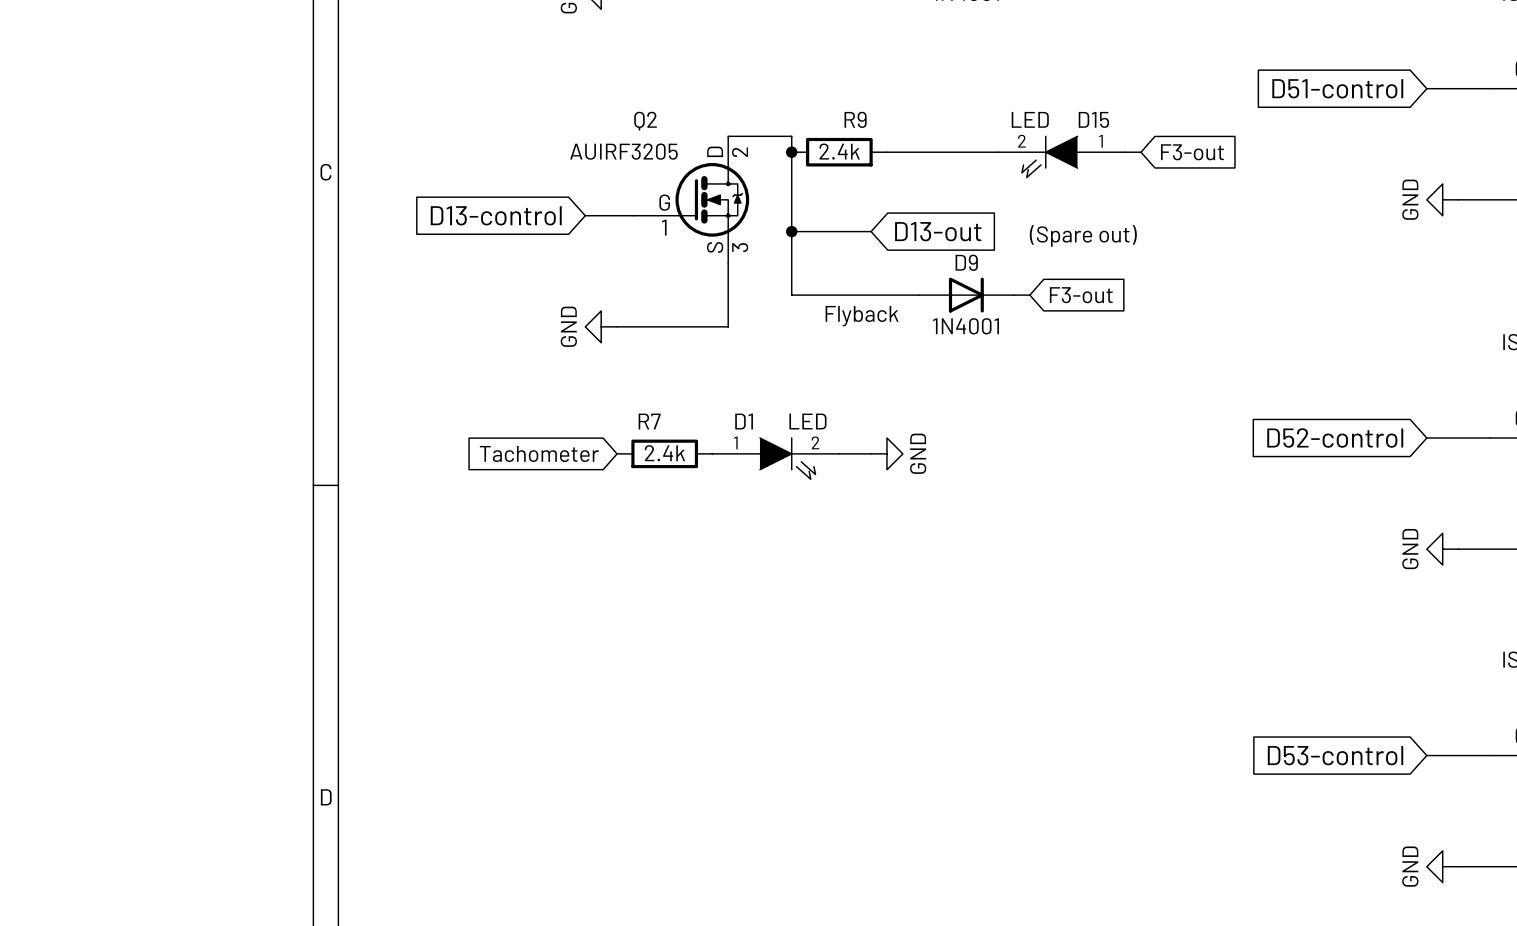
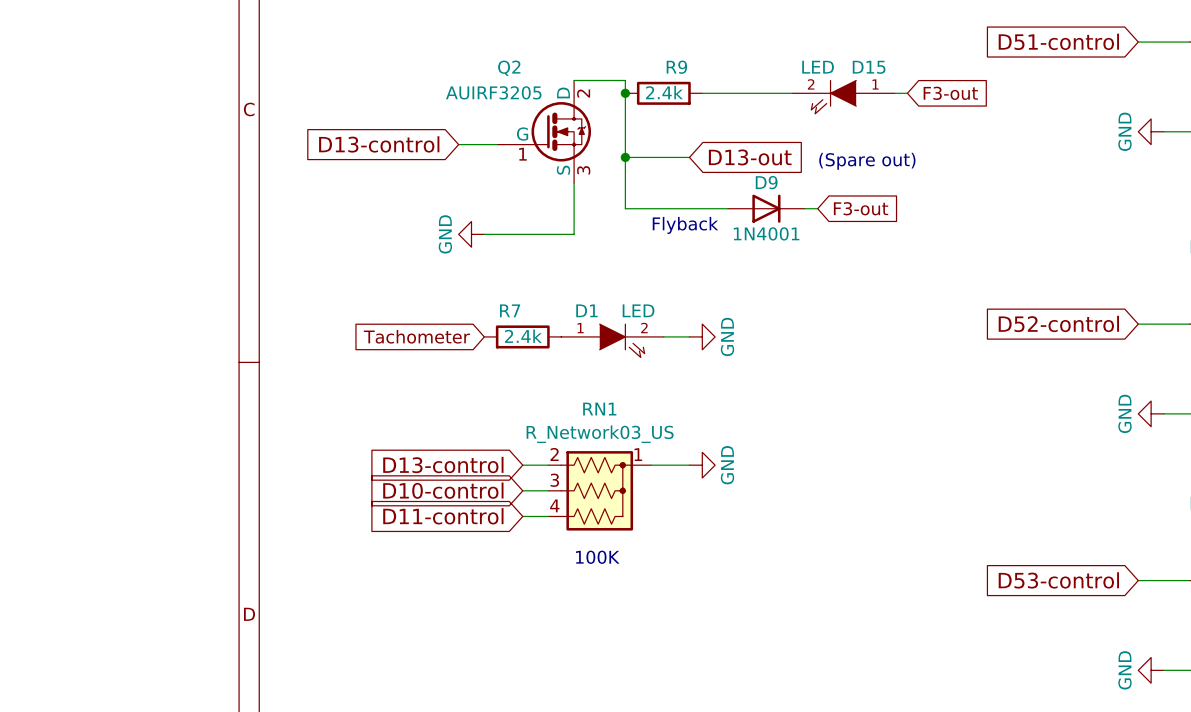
global label: none -> D13-control (443, 465)
wire: none -> (522, 465) (548, 465)
wire: none -> (651, 465) (689, 465)
power symbol: none -> GND (702, 465)
global label: none -> D10-control (443, 490)
wire: none -> (522, 490) (548, 490)
RN1: none -> R_Network03_US (599, 490)
global label: none -> D11-control (443, 516)
wire: none -> (522, 516) (548, 516)
text: none -> 100K (597, 557)

